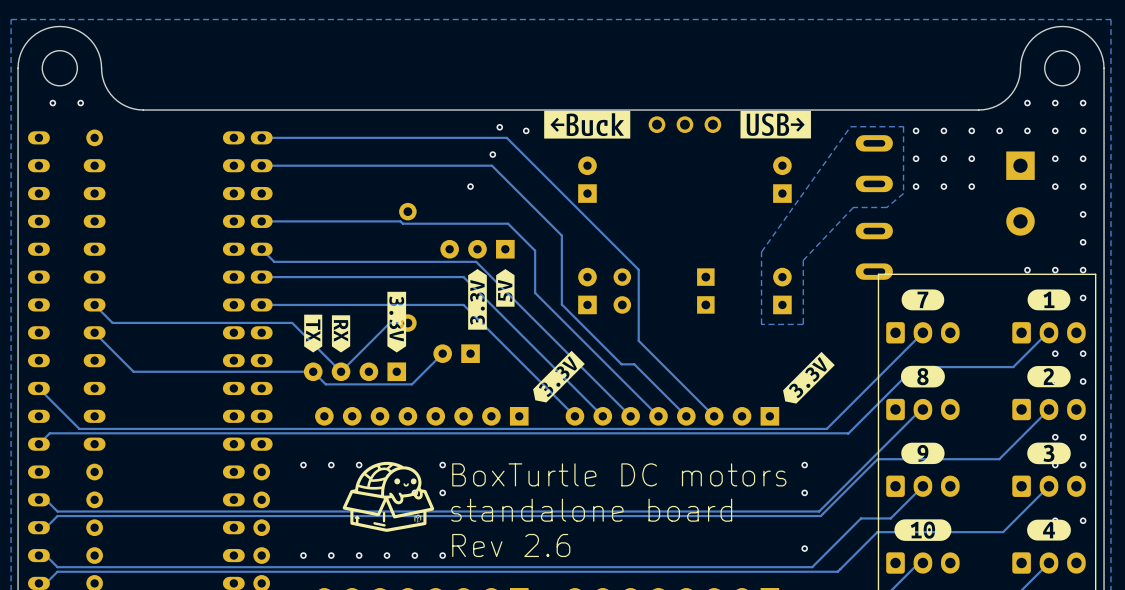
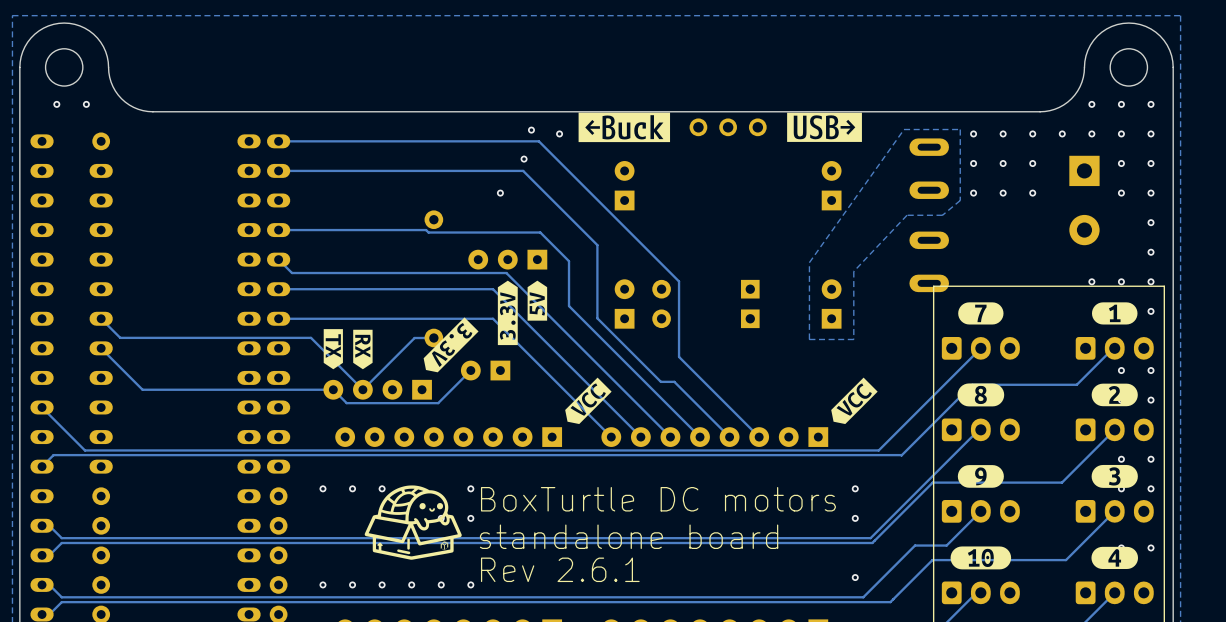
drawing: [387, 291, 407, 353] -> none
drawing: none -> [423, 317, 479, 373]
drawing shape: [533, 350, 585, 403] -> [565, 377, 612, 425]
drawing shape: [783, 351, 835, 404] -> [831, 377, 878, 425]
text: Rev 2.6 (511, 545) -> Rev 2.6.1 (560, 569)

